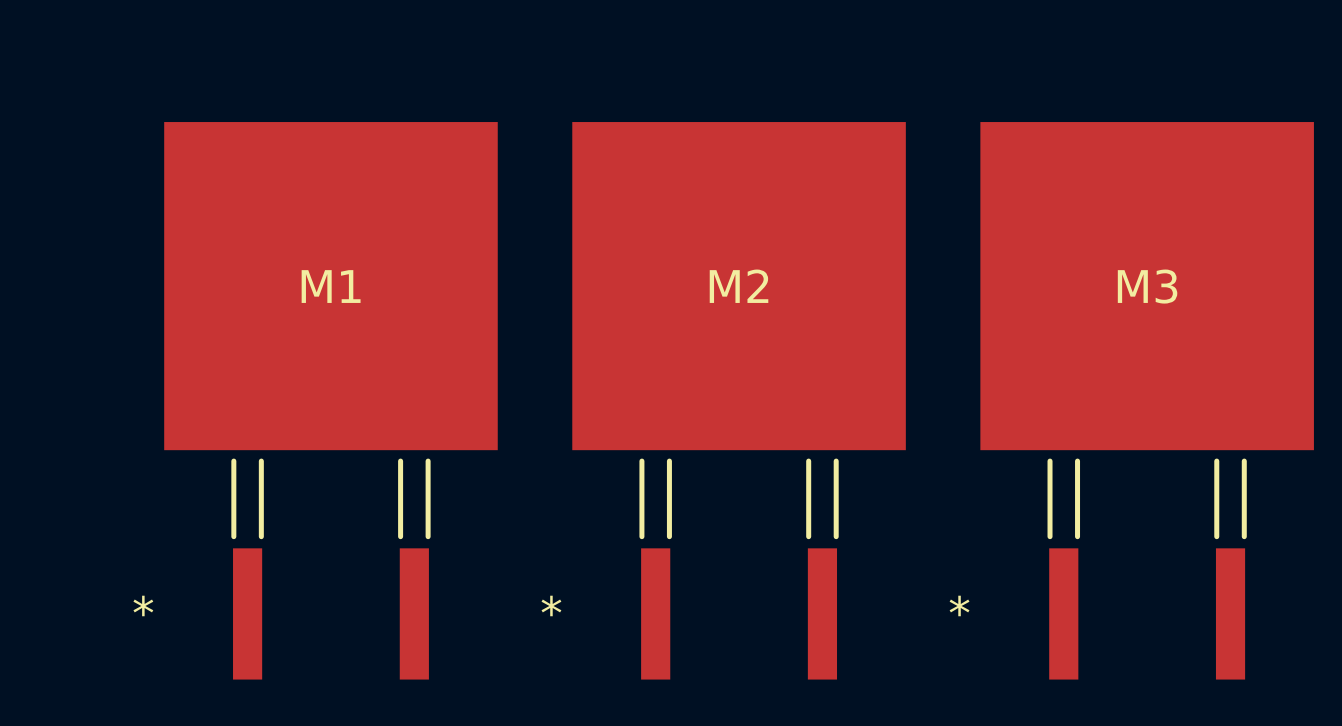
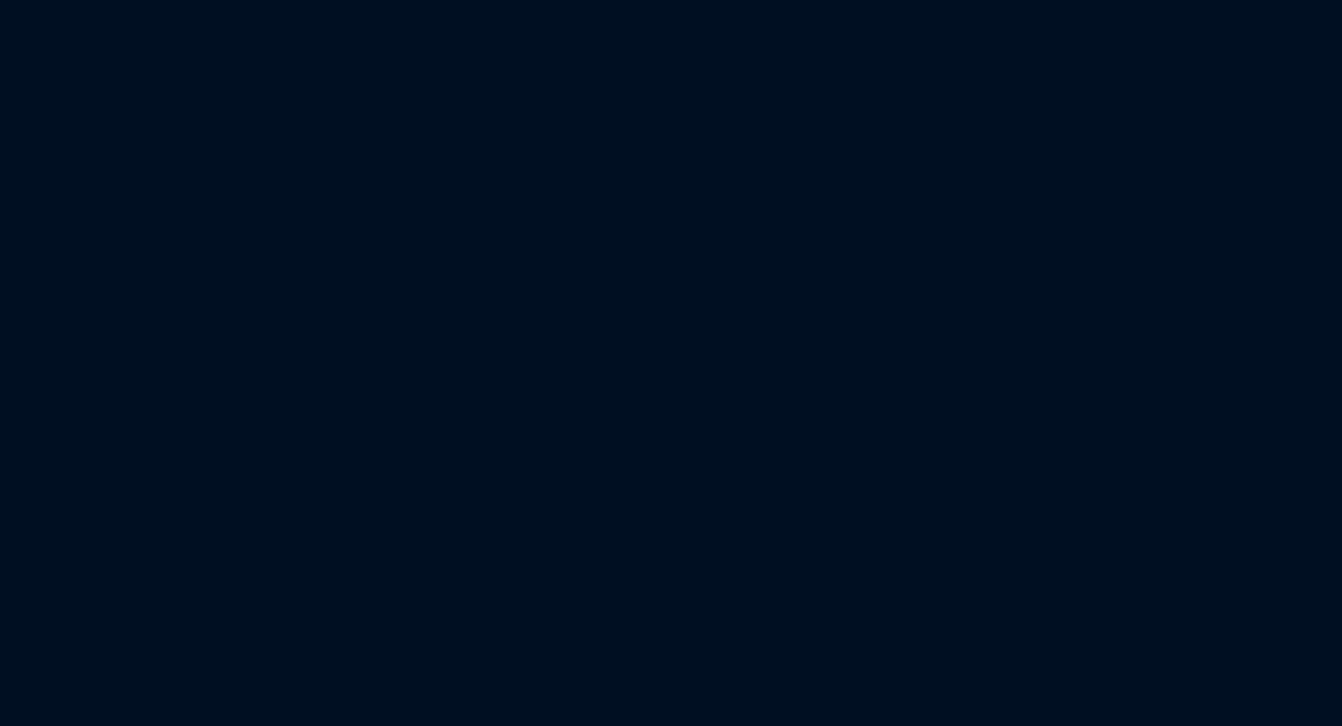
M1: (330, 400) -> none
M2: (739, 400) -> none
M3: (1147, 400) -> none

